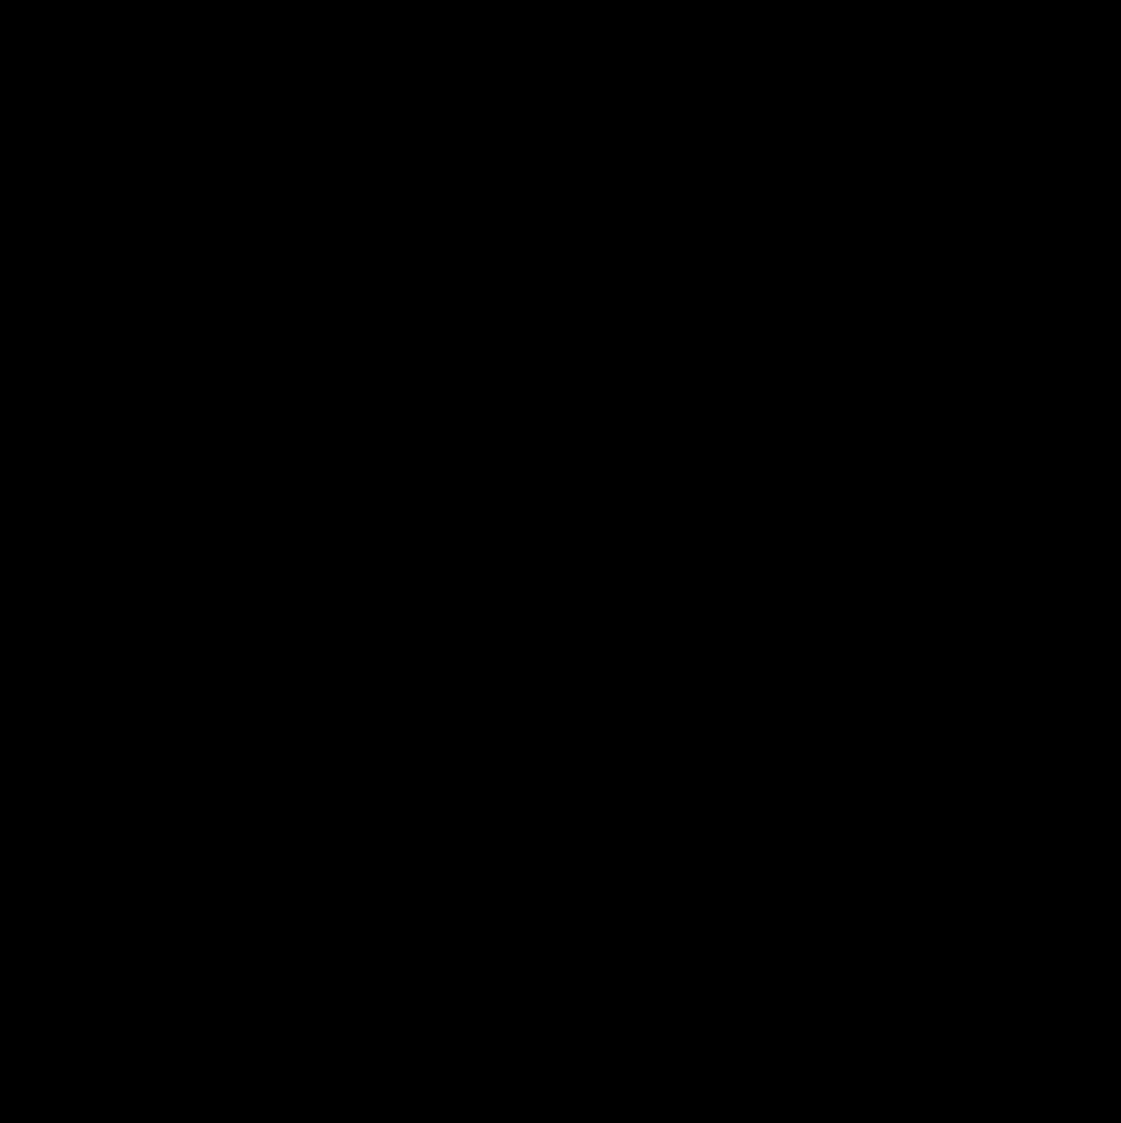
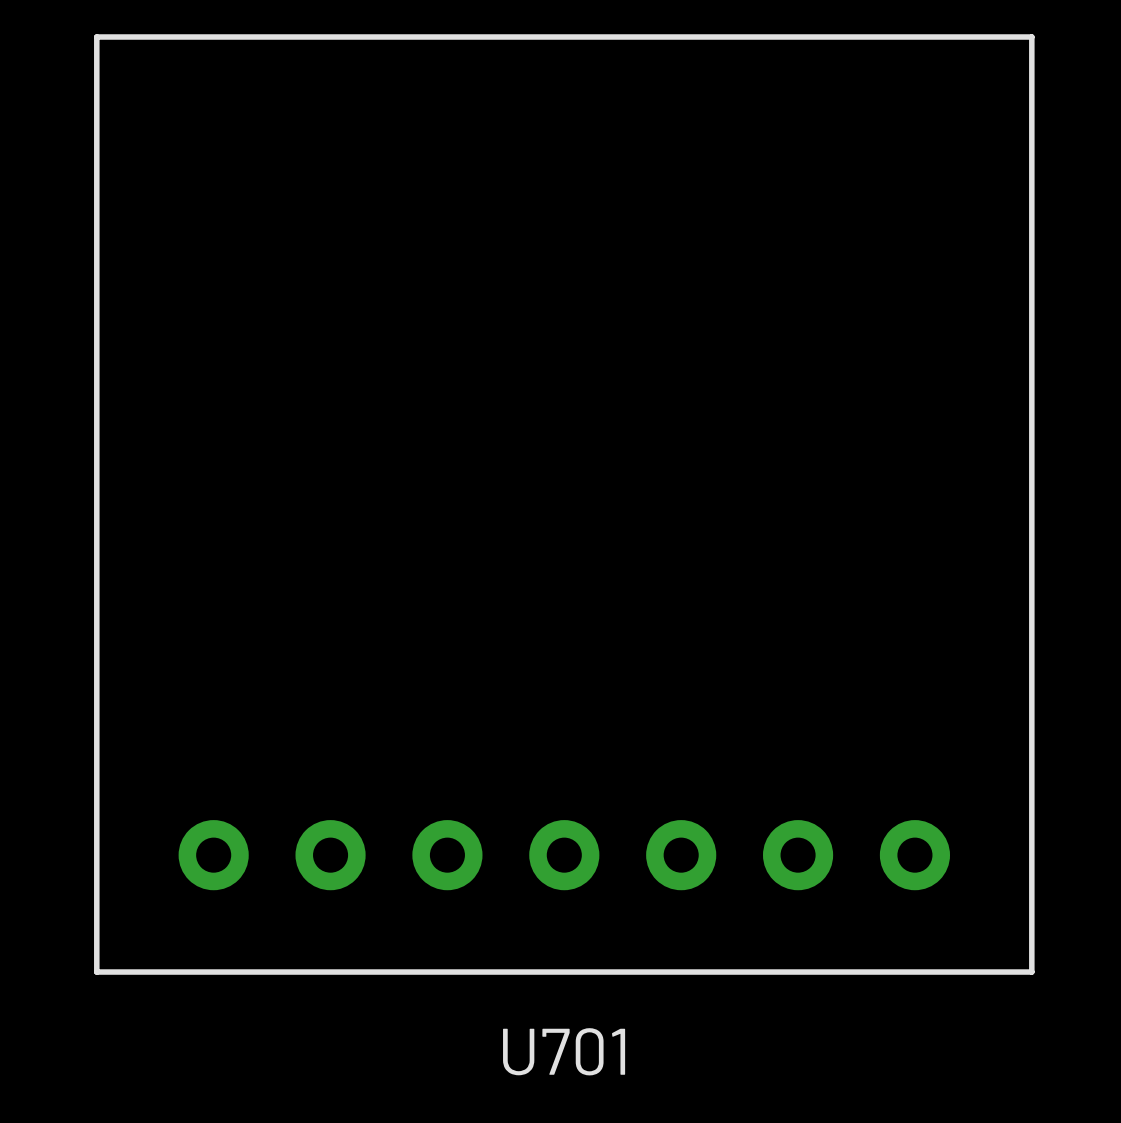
U701: none -> (564, 504)

